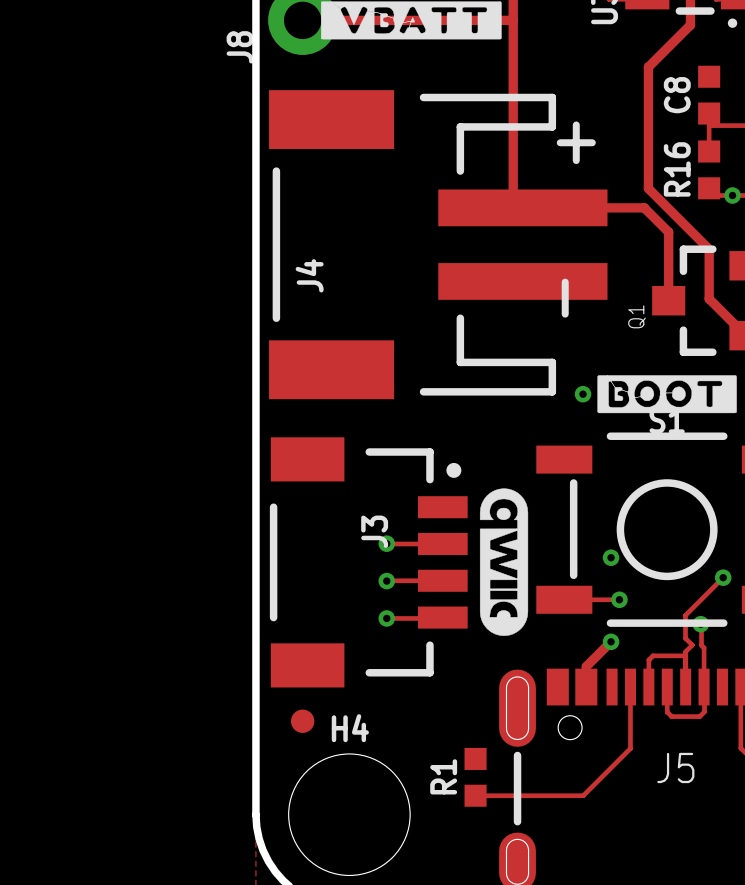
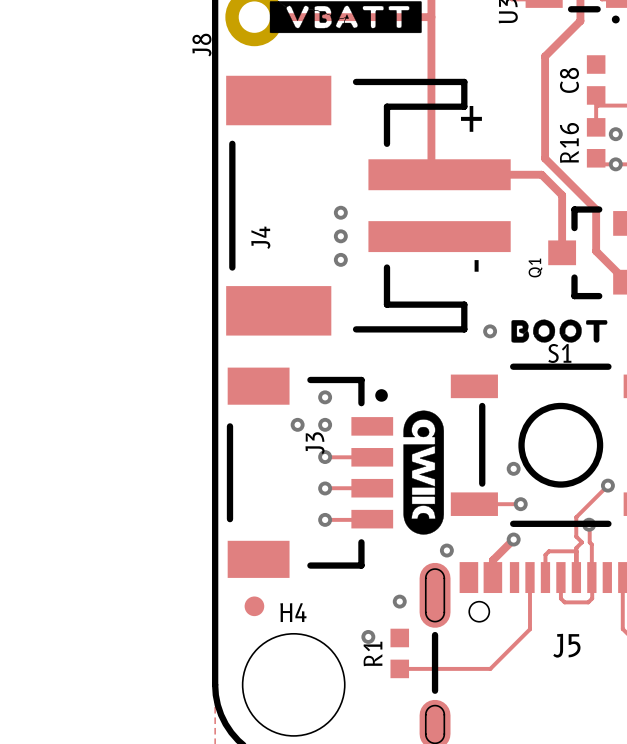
via: none -> (615, 134)
via: none -> (340, 212)
via: none -> (340, 236)
via: none -> (340, 259)
drawing shape: [597, 375, 737, 414] -> [511, 319, 608, 343]
via: none -> (325, 397)
via: none -> (297, 424)
via: none -> (325, 424)
via: none -> (446, 550)
via: none -> (399, 601)
via: none -> (368, 636)

